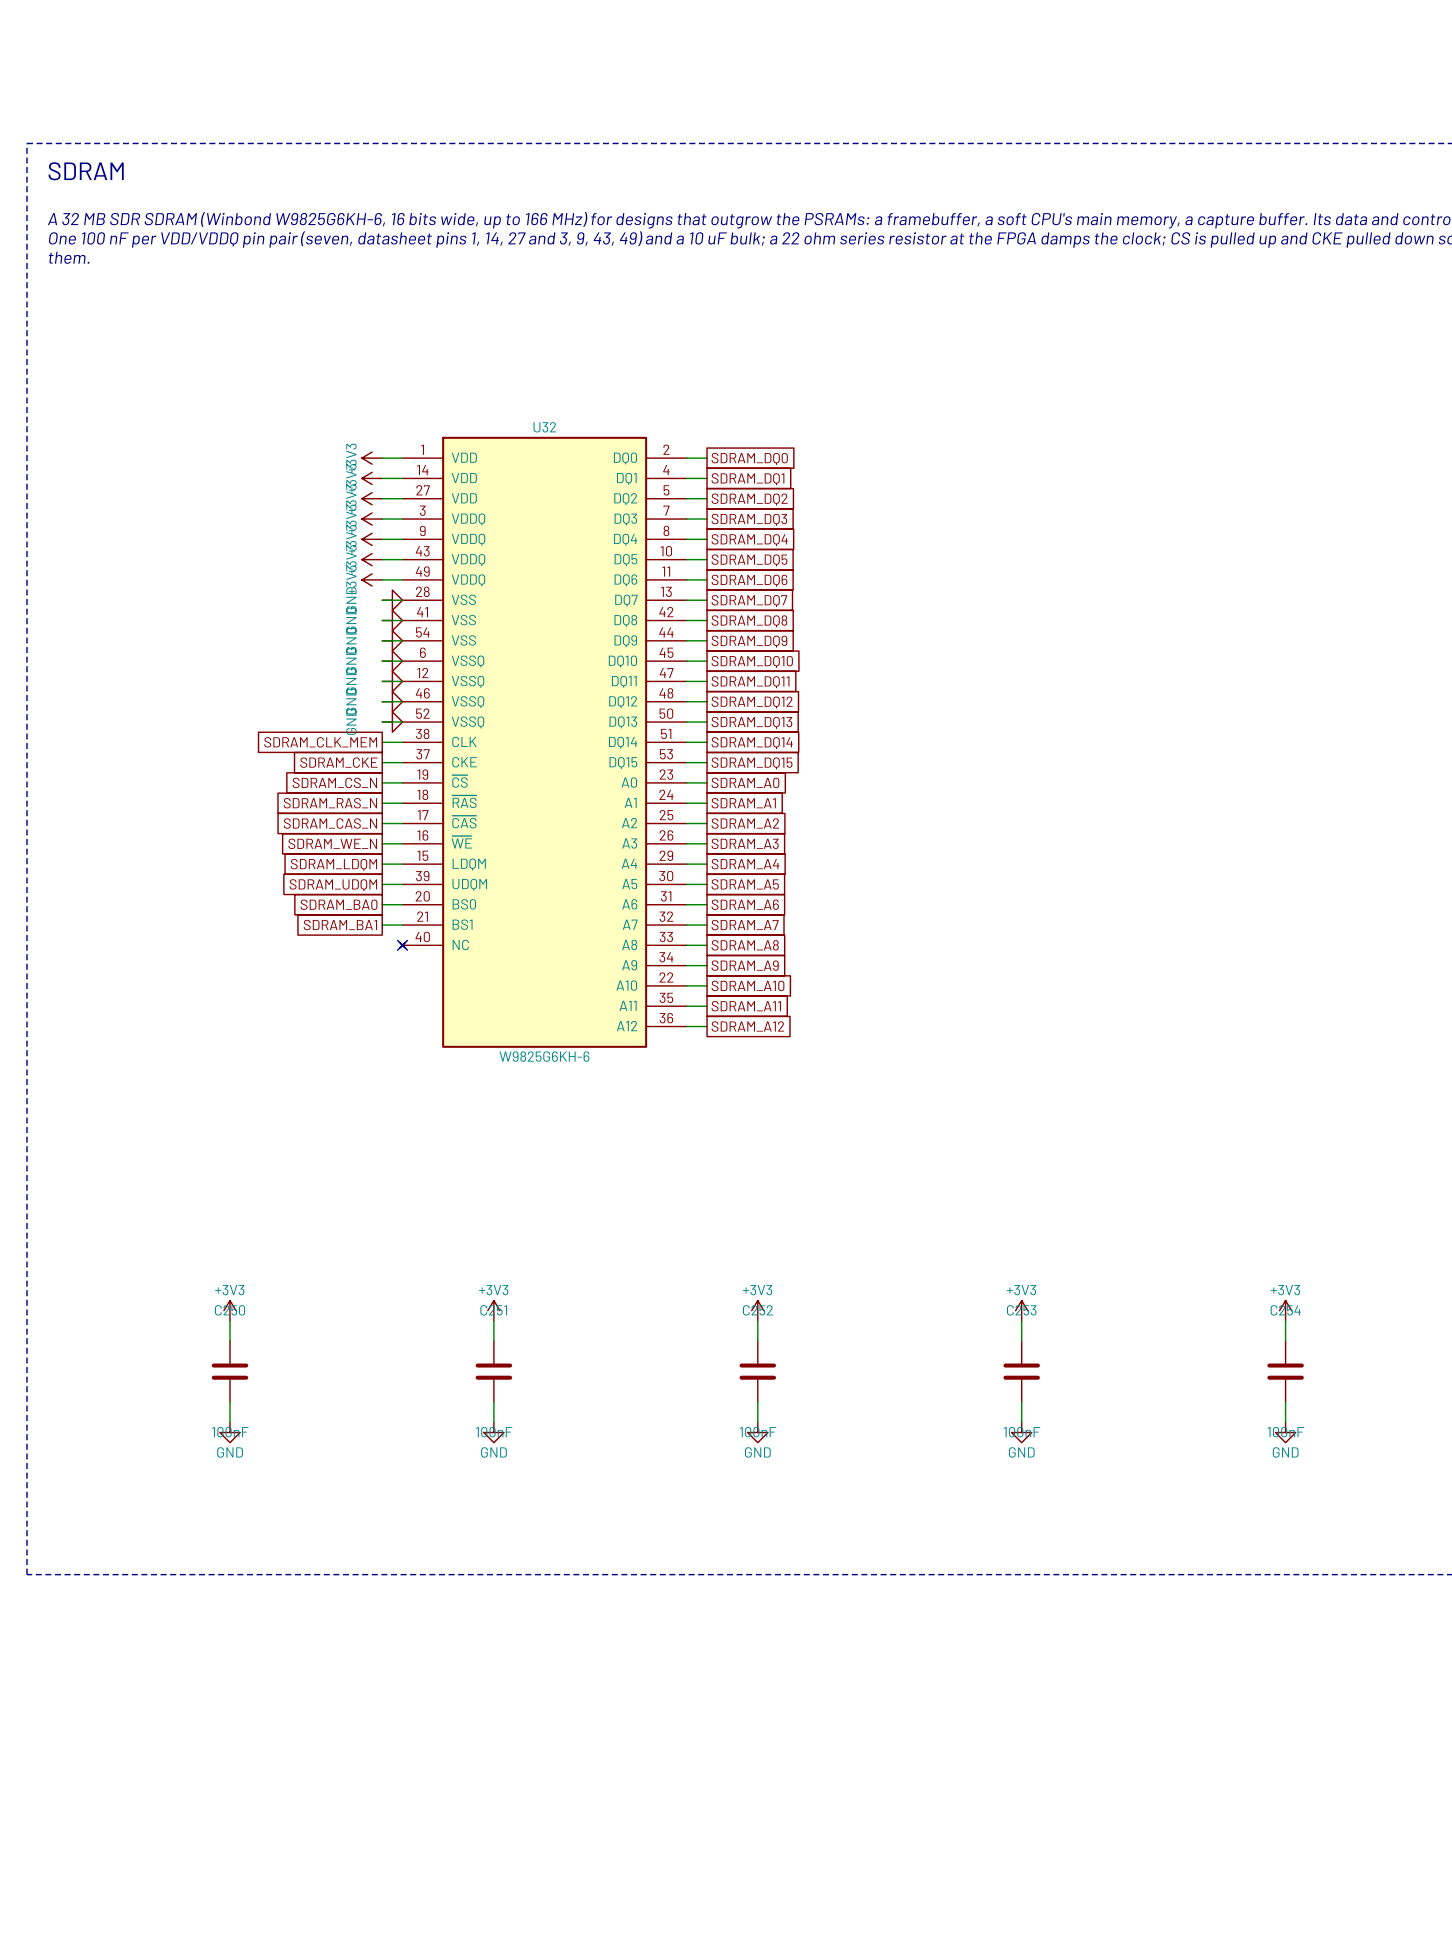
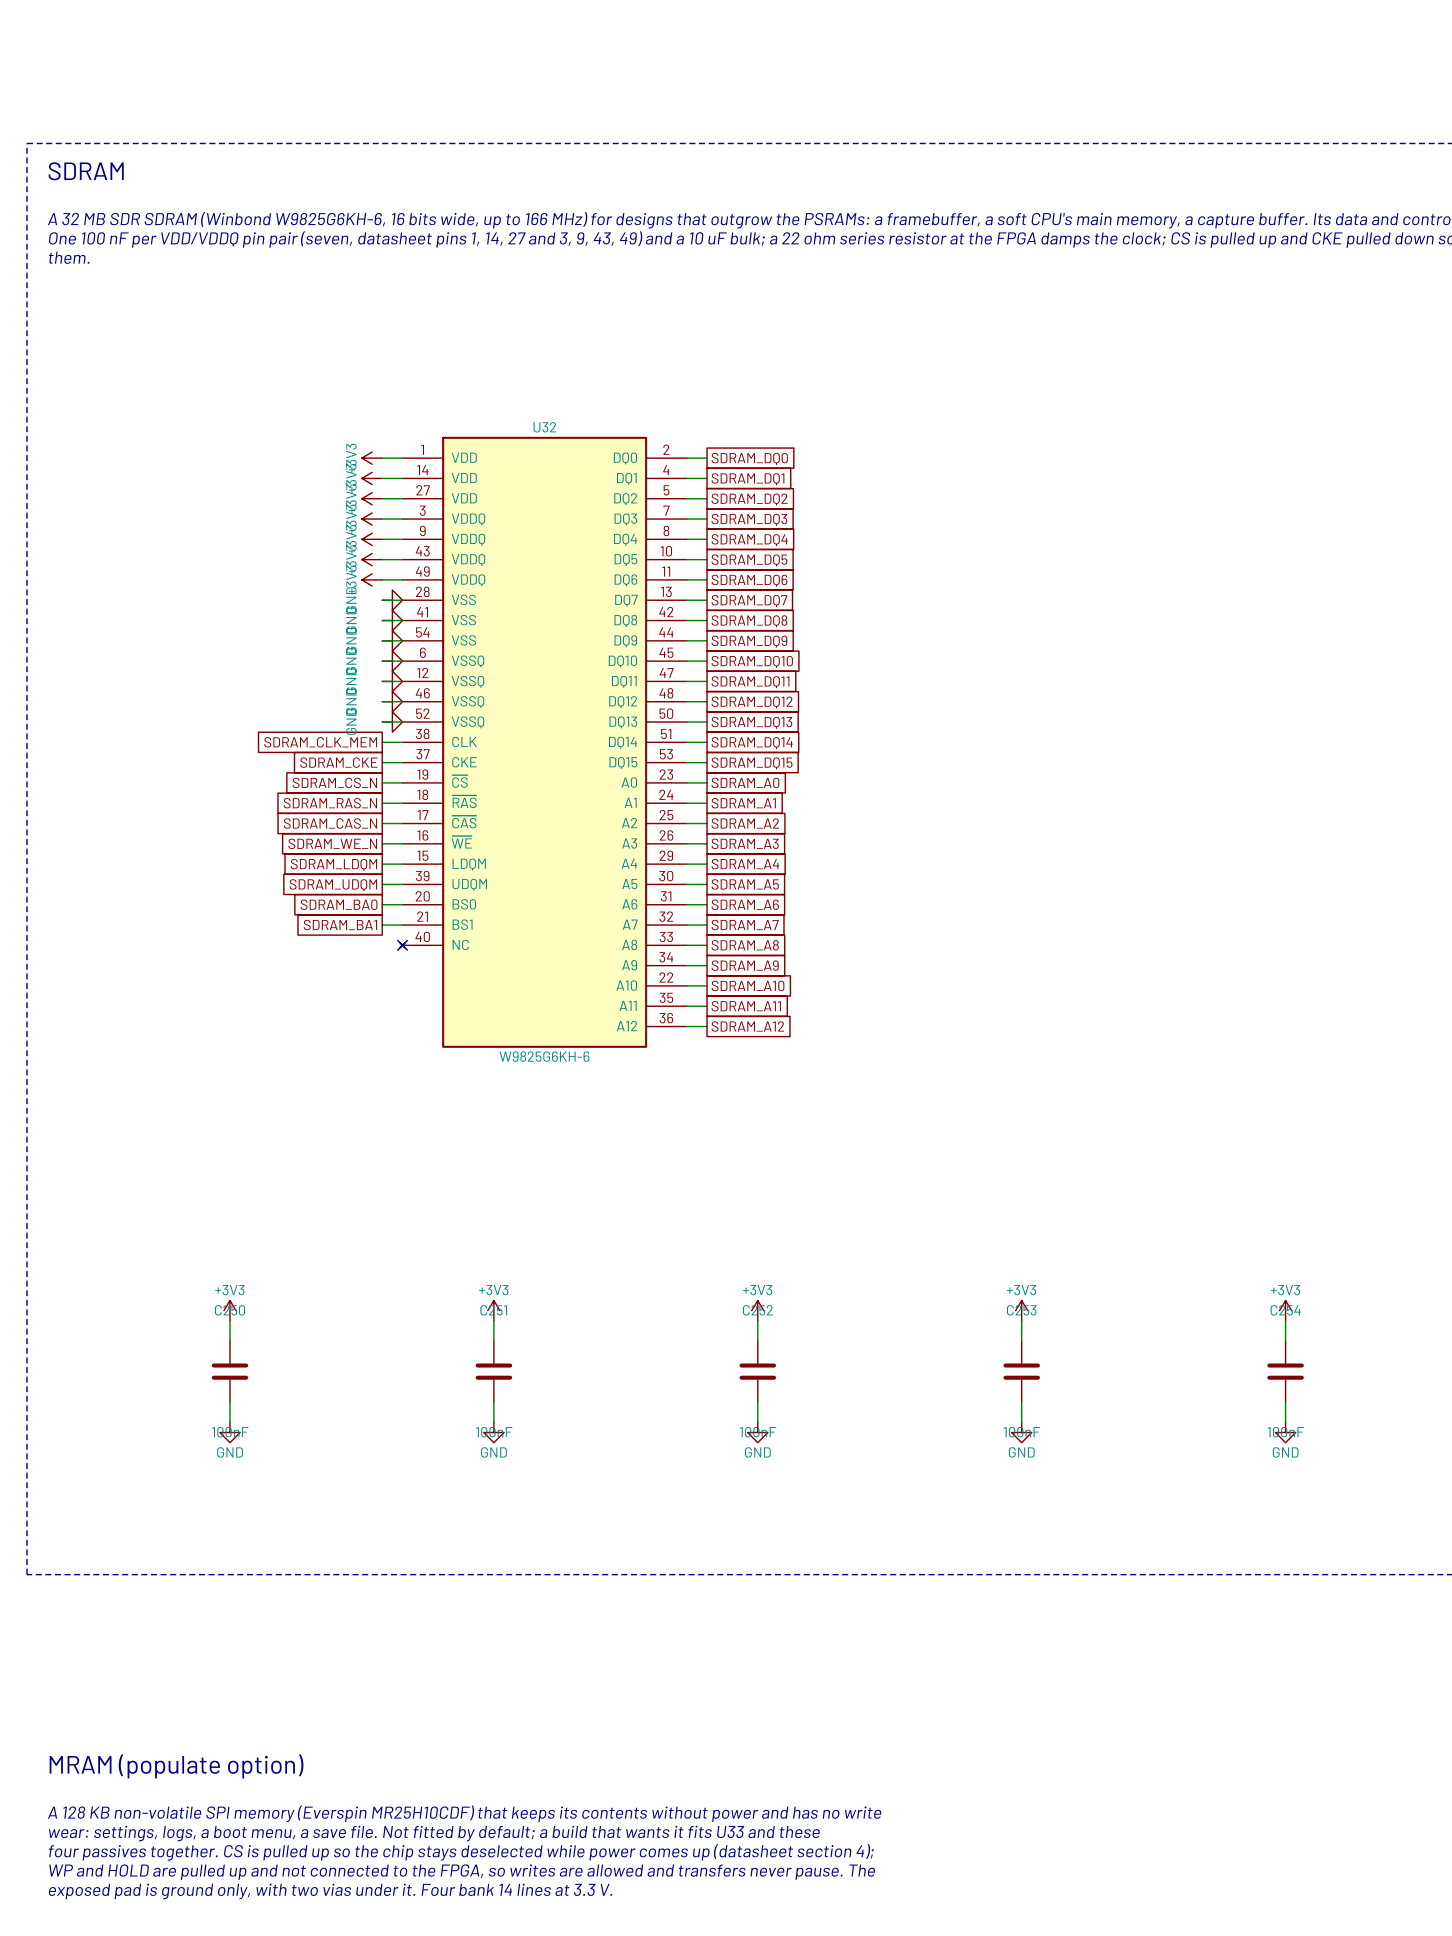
text: none -> MRAM (populate option) (176, 1766)
text: none -> A 128 KB non-volatile SPI memory (Everspin MR25H10CDF) that keeps its contents without power and has no write (464, 1813)
text: none -> wear: settings, logs, a boot menu, a save file. Not fitted by default; a build that wants it fits U33 and these (434, 1833)
text: none -> four passives together. CS is pulled up so the chip stays deselected while power comes up (datasheet section 4); (461, 1852)
text: none -> WP and HOLD are pulled up and not connected to the FPGA, so writes are allowed and transfers never pause. The (462, 1872)
text: none -> exposed pad is ground only, with two vias under it. Four bank 14 lines at 3.3 V. (330, 1891)

